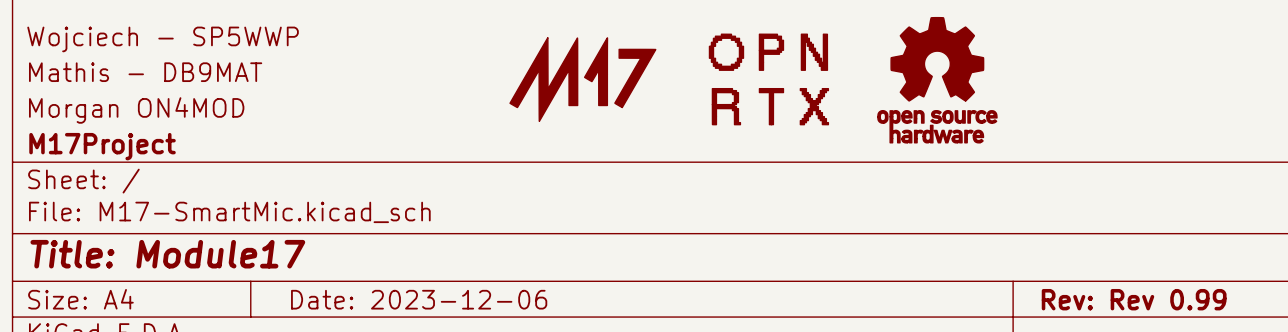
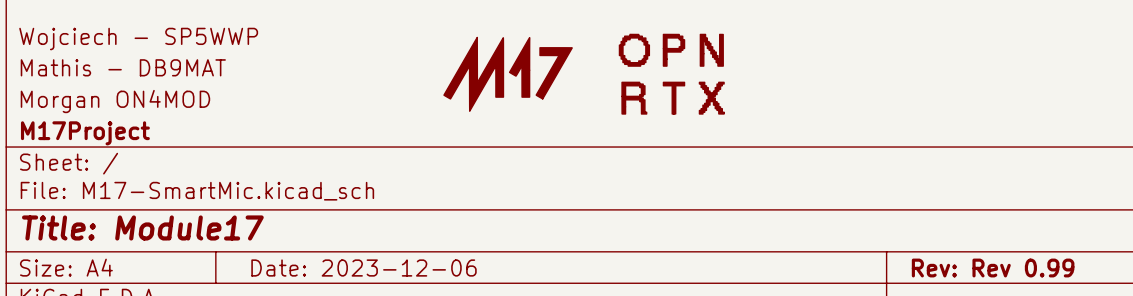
part: (937, 80) -> none

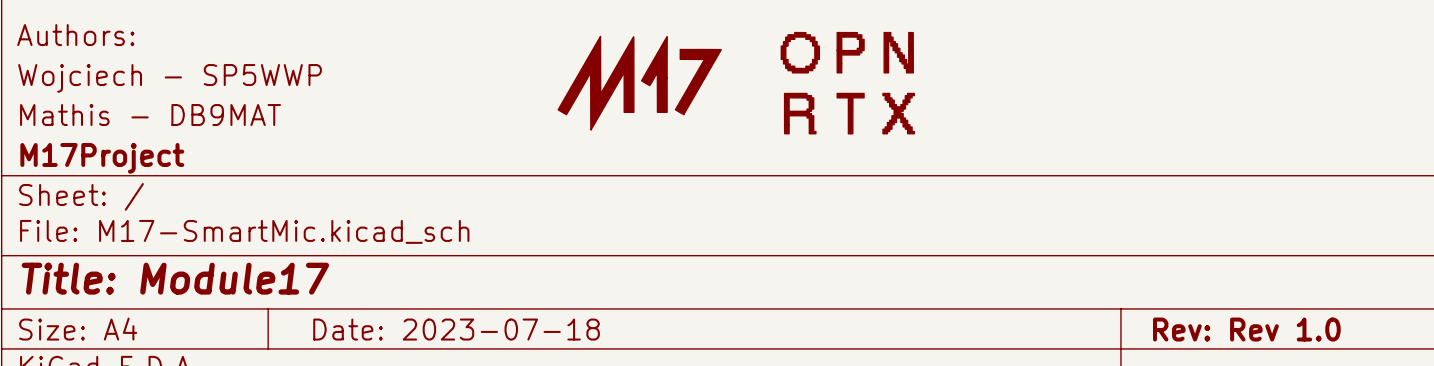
title block: Wojciech - SP5WWP (138, 39) -> Authors: (75, 35)
title block: Mathis - DB9MAT (123, 67) -> Wojciech - SP5WWP (170, 78)
title block: Morgan ON4MOD (115, 101) -> Mathis - DB9MAT (150, 115)
title block: Date: 2023-12-06 (363, 268) -> Date: 2023-07-18 (456, 329)
title block: Rev: Rev 0.99 (993, 268) -> Rev: Rev 1.0 (1246, 329)

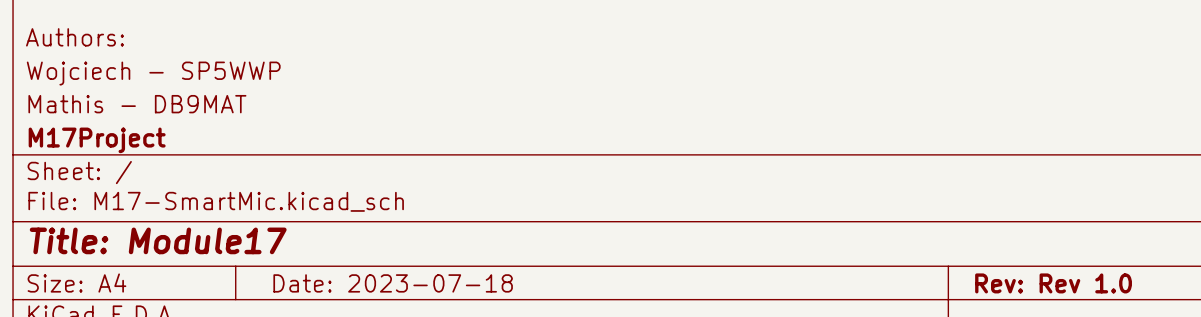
part: (639, 83) -> none
part: (847, 83) -> none

